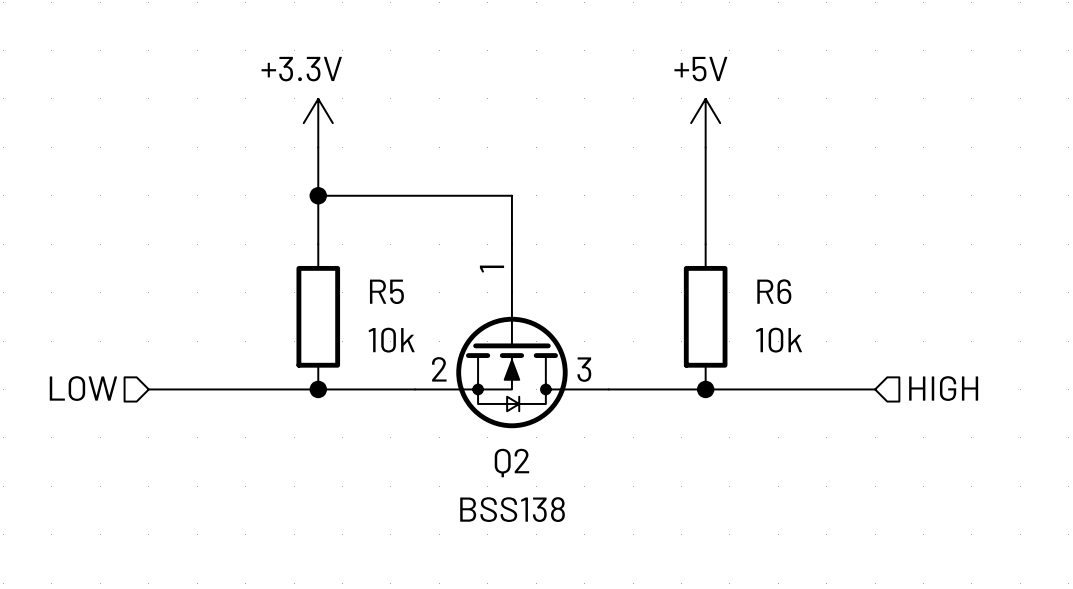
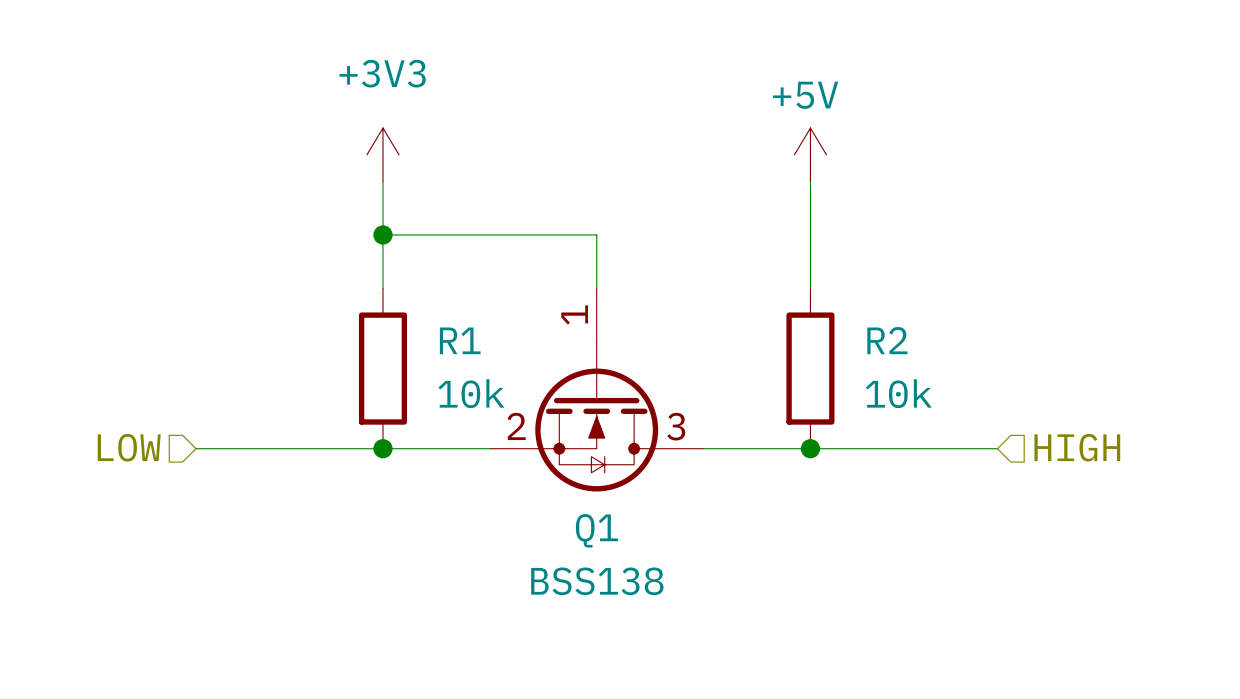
power symbol: +3.3V (318, 123) -> +3V3 (382, 154)
R5 name: R5 (386, 291) -> R1 (460, 340)
R6 name: R6 (774, 291) -> R2 (887, 340)
Q2 name: Q2 (511, 463) -> Q1 (596, 530)

